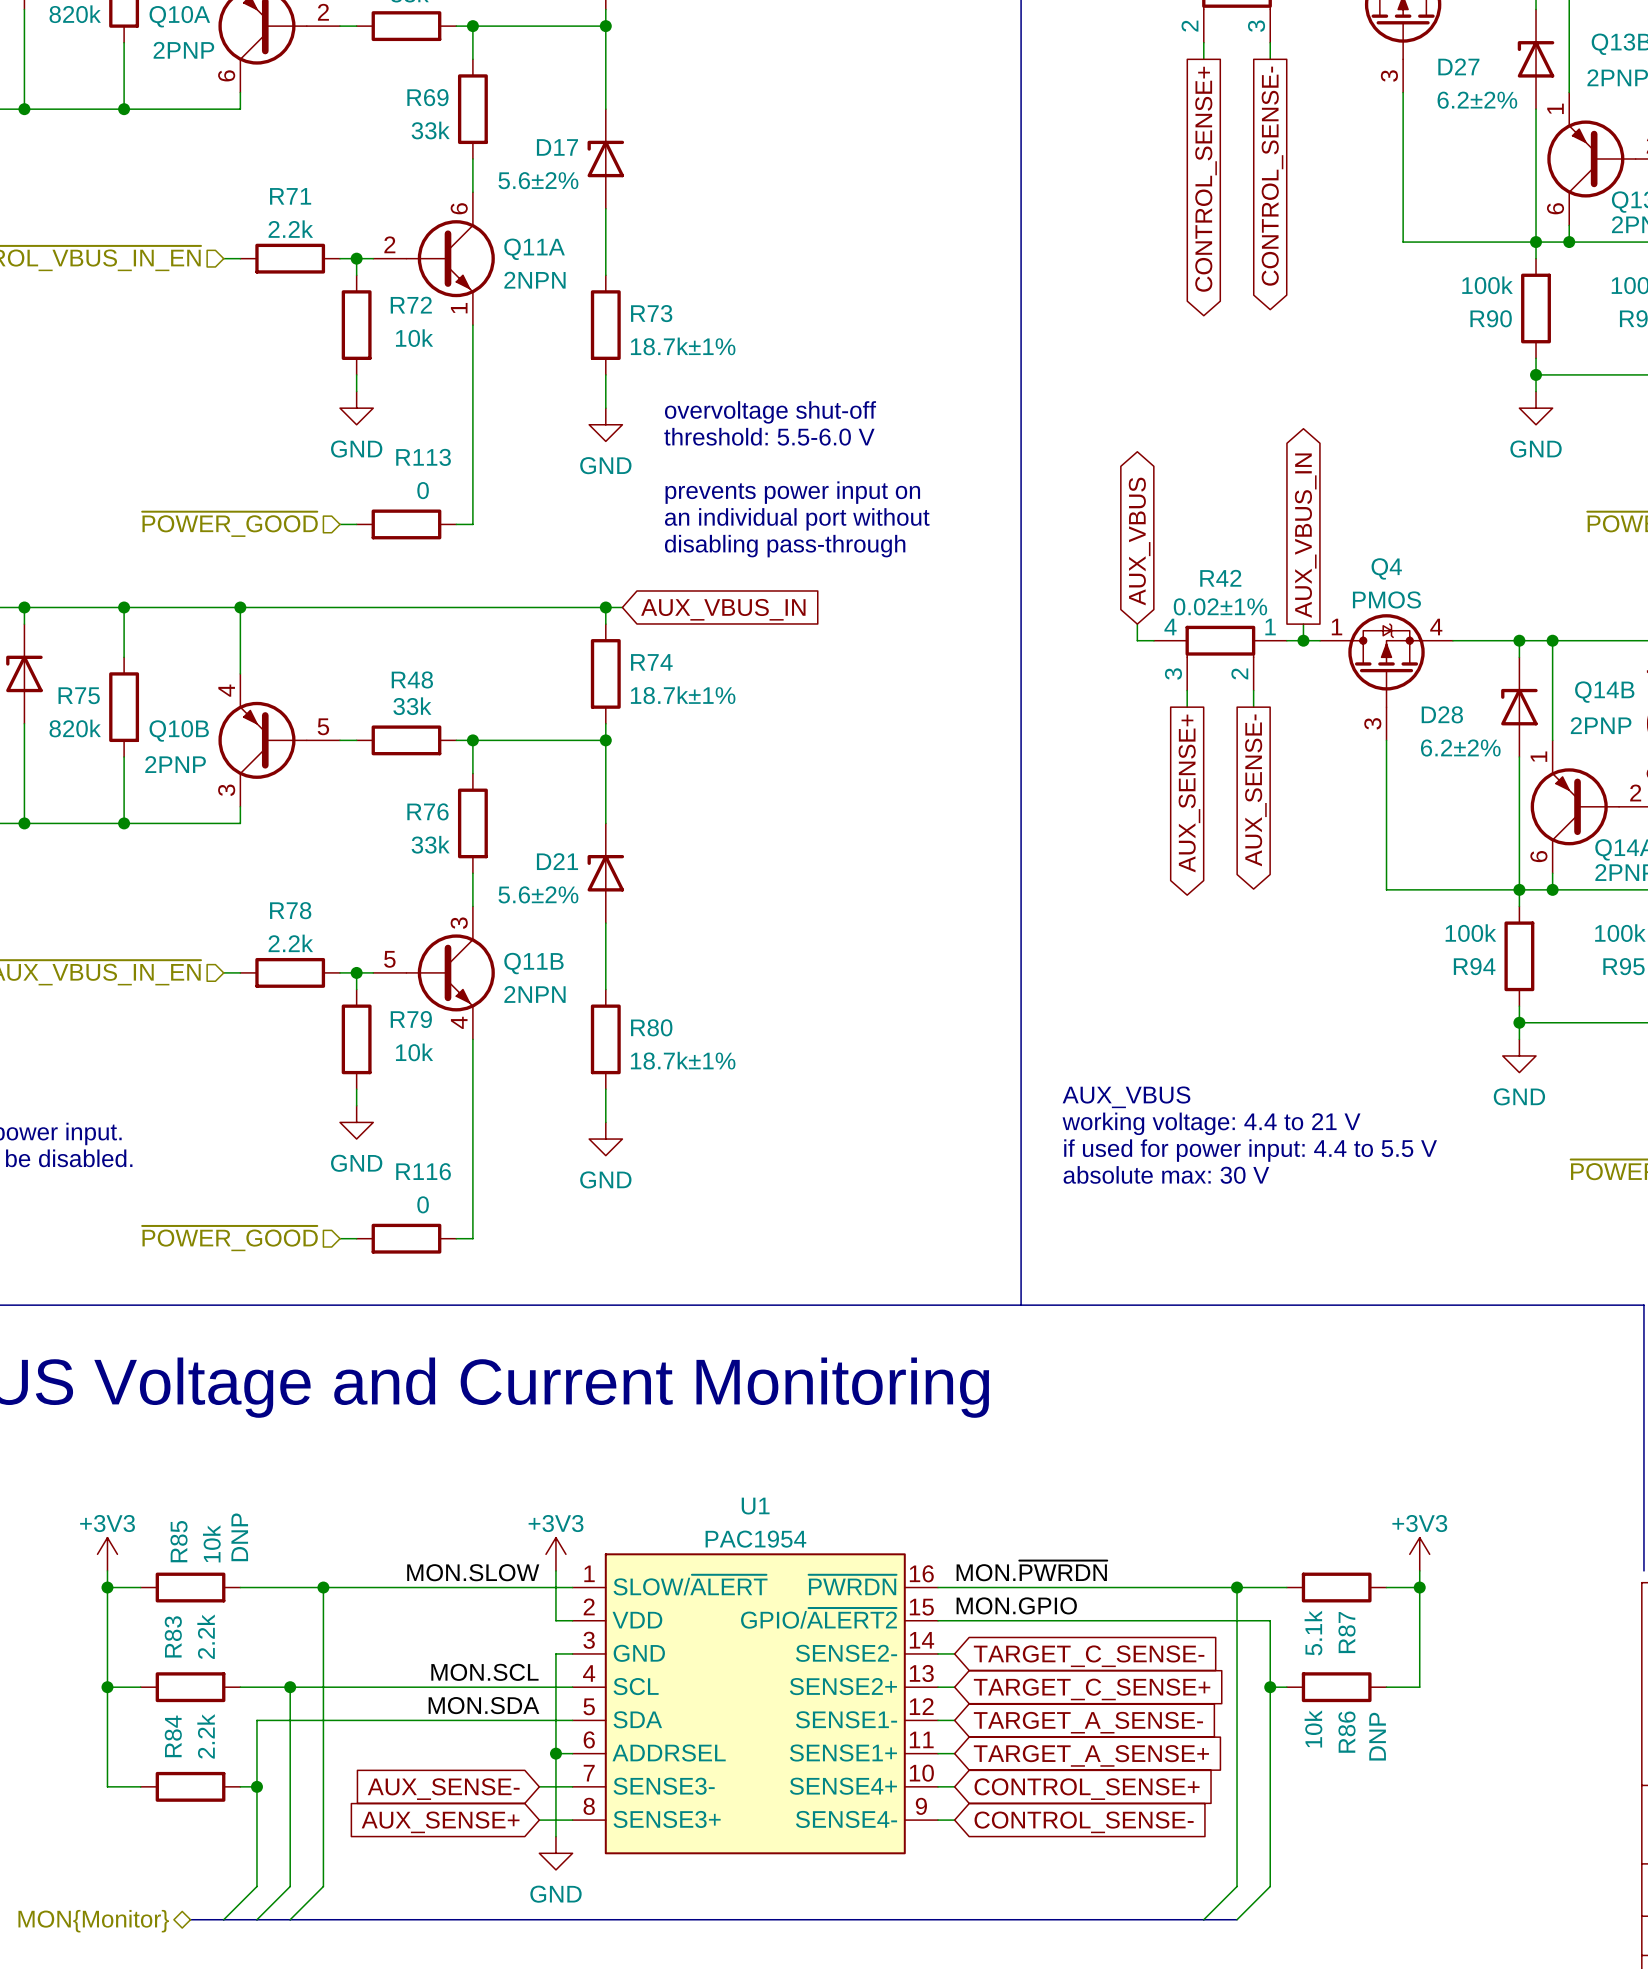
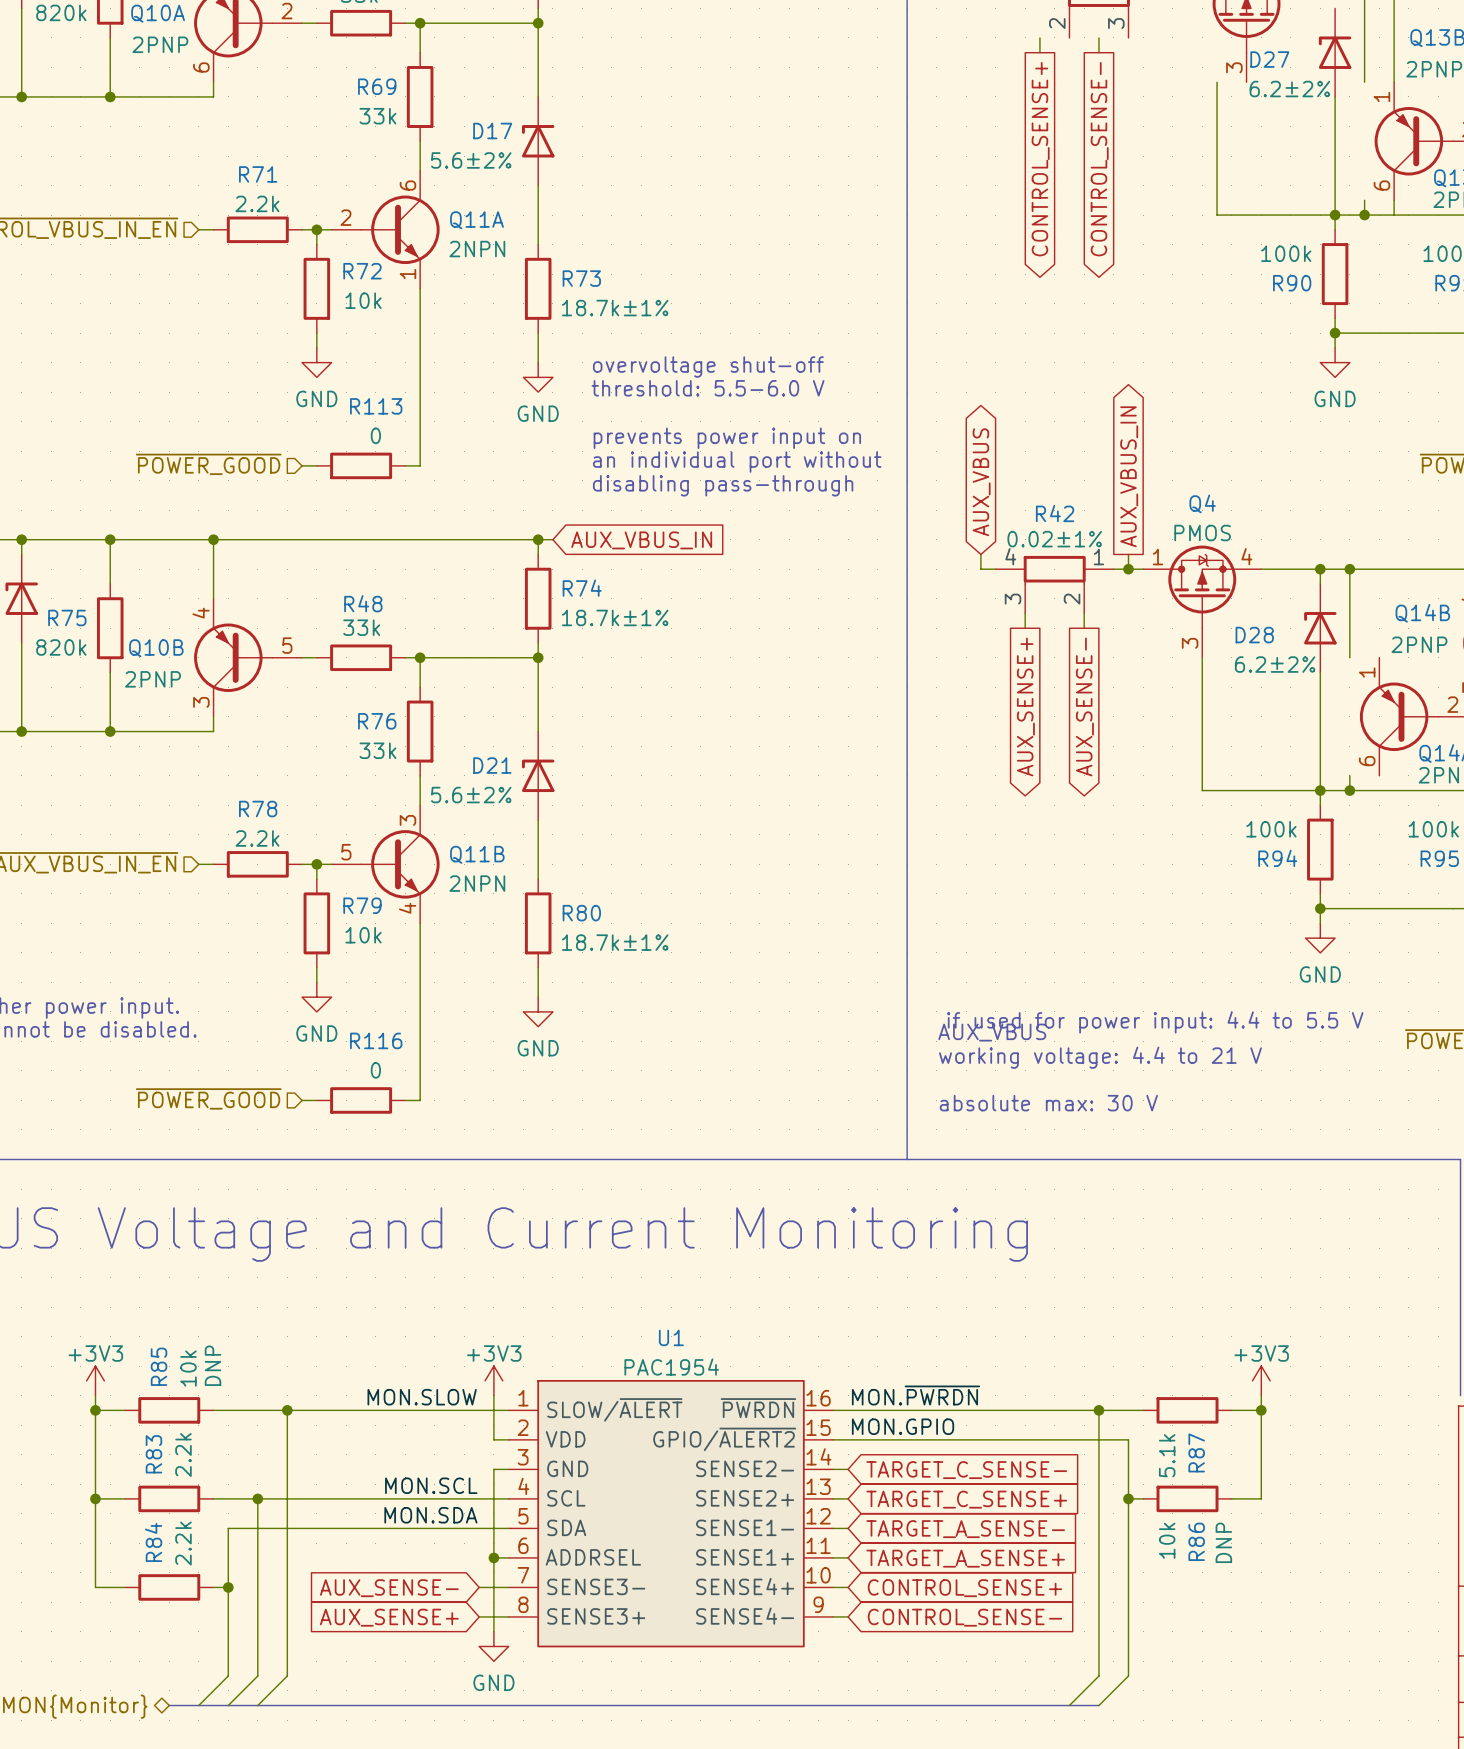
wire: (1203, 42) (1203, 59) -> (1039, 37) (1039, 52)
wire: (1270, 42) (1270, 59) -> (1098, 37) (1098, 52)
D27 position: (1536, 59) -> (1335, 52)
wire: (1403, 92) (1403, 242) -> (1217, 82) (1217, 215) (1246, 215)
wire: none -> (1335, 96) (1335, 229)
wire: (1536, 109) (1536, 225) -> none
global label position: CONTROL_SENSE- (1272, 176) -> CONTROL_SENSE- (1099, 159)
global label position: CONTROL_SENSE+ (1206, 179) -> CONTROL_SENSE+ (1040, 159)
wire: (1536, 242) (1536, 258) -> none
junction position: (1569, 242) -> (1335, 215)
R90 position: (1536, 308) -> (1335, 274)
wire: (1536, 358) (1536, 391) -> (1335, 318) (1335, 347)
wire: none -> (1335, 333) (1364, 333)
junction position: (1536, 374) -> (1335, 333)
power symbol position: GND (1536, 408) -> GND (1335, 362)
global label position: AUX_VBUS_IN (1305, 535) -> AUX_VBUS_IN (1129, 476)
global label position: AUX_VBUS (1139, 541) -> AUX_VBUS (981, 482)
wire: (1137, 624) (1137, 640) (1153, 640) -> (980, 554) (980, 569) (995, 569)
junction position: (1303, 640) -> (1128, 569)
wire: (1552, 640) (1552, 740) -> none
junction position: (1552, 640) -> (1320, 569)
R42 position: (1220, 658) -> (1054, 584)
Q4 position: (1386, 677) -> (1202, 601)
wire: (1187, 690) (1187, 707) -> (1025, 613) (1025, 628)
wire: (1253, 690) (1253, 707) -> (1084, 613) (1084, 628)
D28 position: (1519, 707) -> (1320, 628)
wire: (1386, 740) (1386, 889) -> (1202, 657) (1202, 790) (1231, 790)
wire: none -> (1320, 672) (1320, 805)
wire: (1519, 756) (1519, 873) -> none
global label position: AUX_SENSE- (1255, 790) -> AUX_SENSE- (1084, 706)
global label position: AUX_SENSE+ (1189, 793) -> AUX_SENSE+ (1025, 706)
wire: (1552, 873) (1552, 889) -> (1320, 569) (1320, 583)
wire: (1519, 889) (1519, 906) -> none
junction position: (1552, 889) -> (1320, 790)
R94 position: (1519, 956) -> (1320, 849)
wire: (1519, 1006) (1519, 1039) -> (1320, 893) (1320, 923)
wire: none -> (1320, 908) (1349, 908)
junction position: (1519, 1022) -> (1320, 908)
power symbol position: GND (1519, 1055) -> GND (1320, 938)
text position: AUX_VBUS (1126, 1097) -> AUX_VBUS (992, 1032)
text position: working voltage: 4.4 to 21 V (1211, 1123) -> working voltage: 4.4 to 21 V (1100, 1057)
text position: absolute max: 30 V (1166, 1174) -> absolute max: 30 V (1048, 1103)

